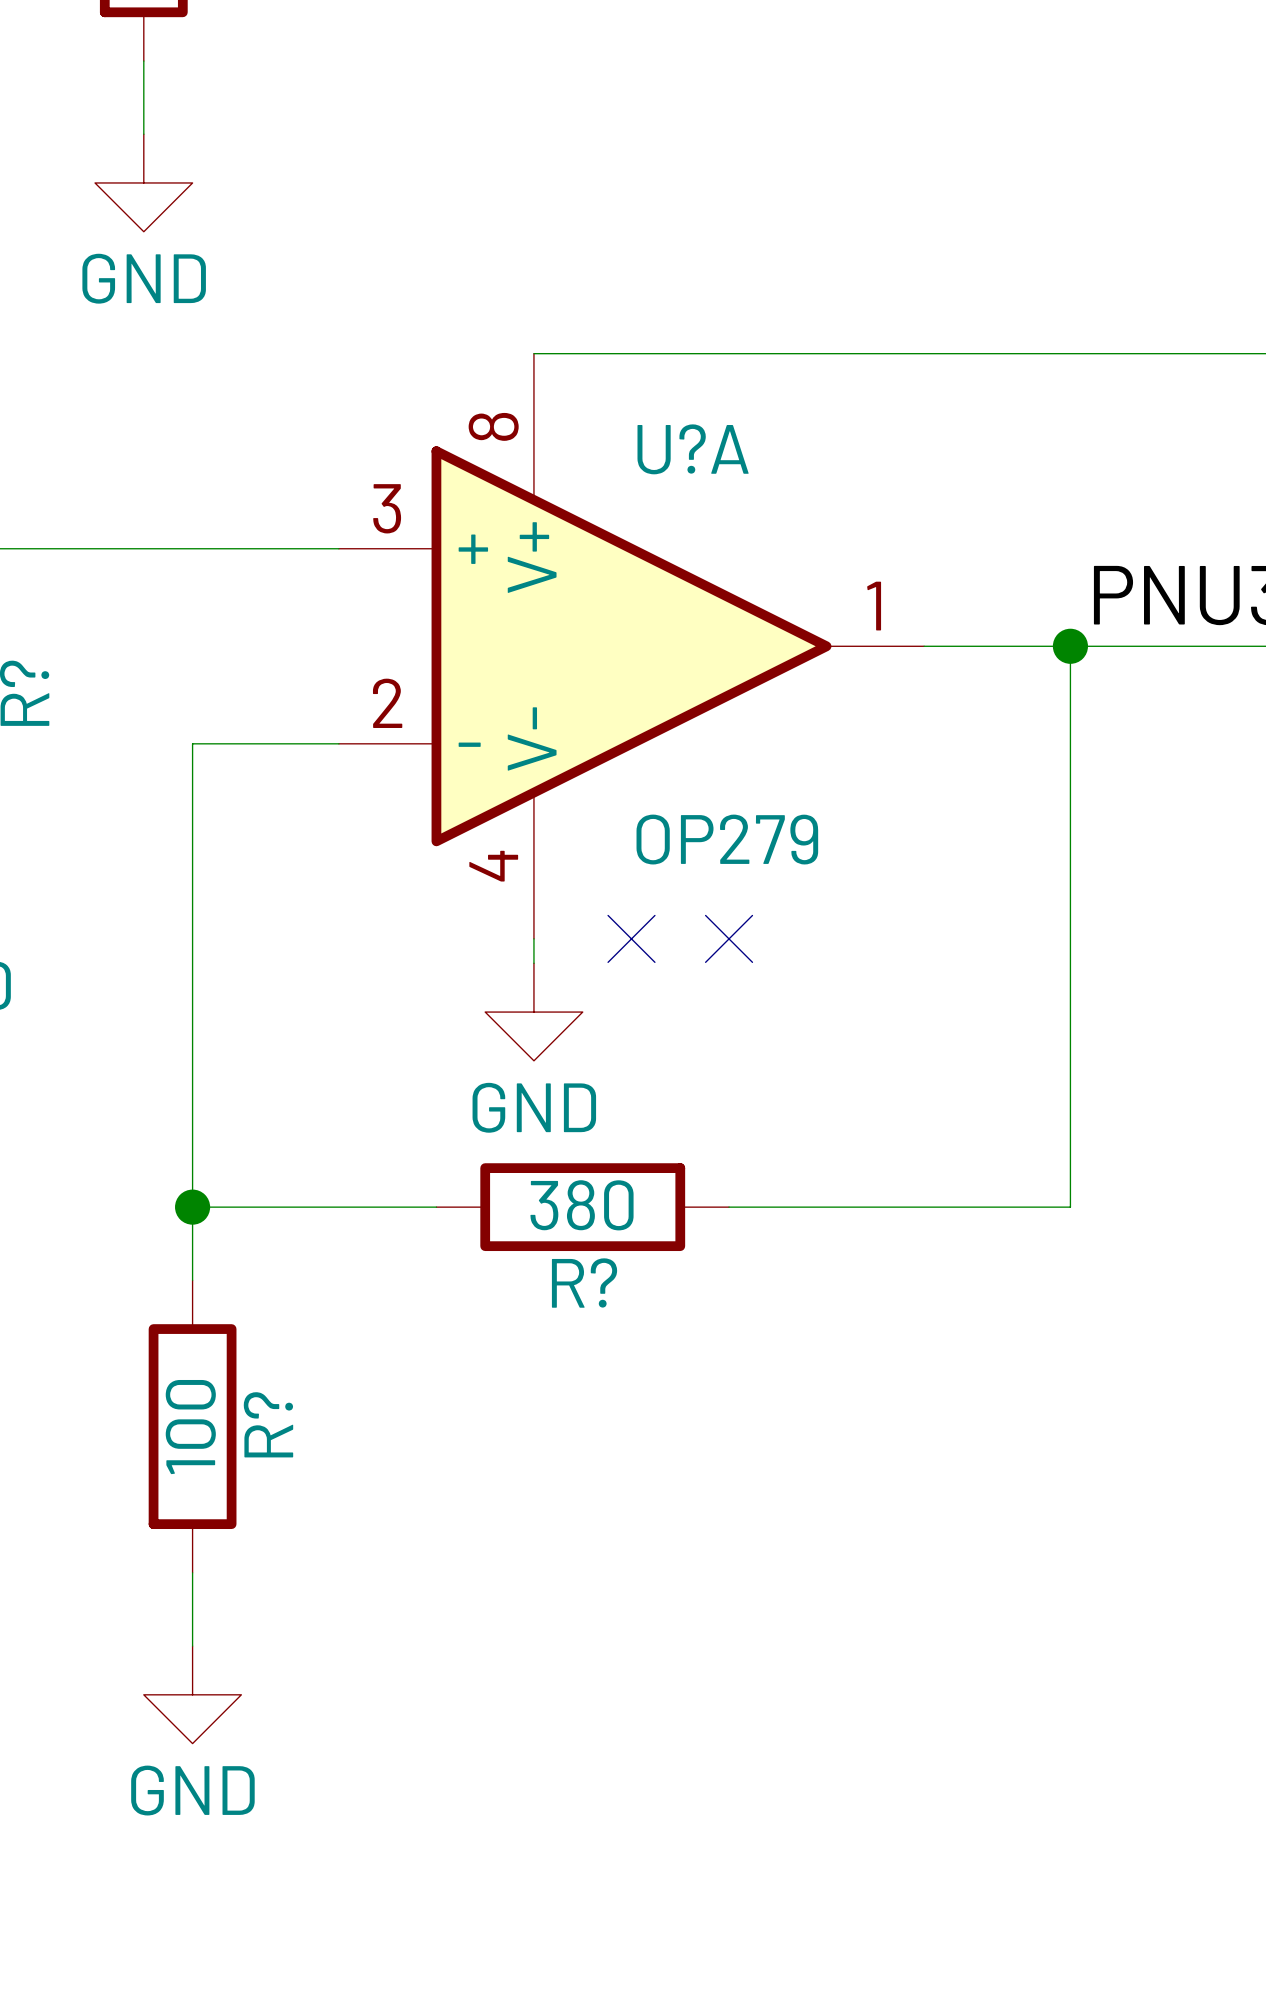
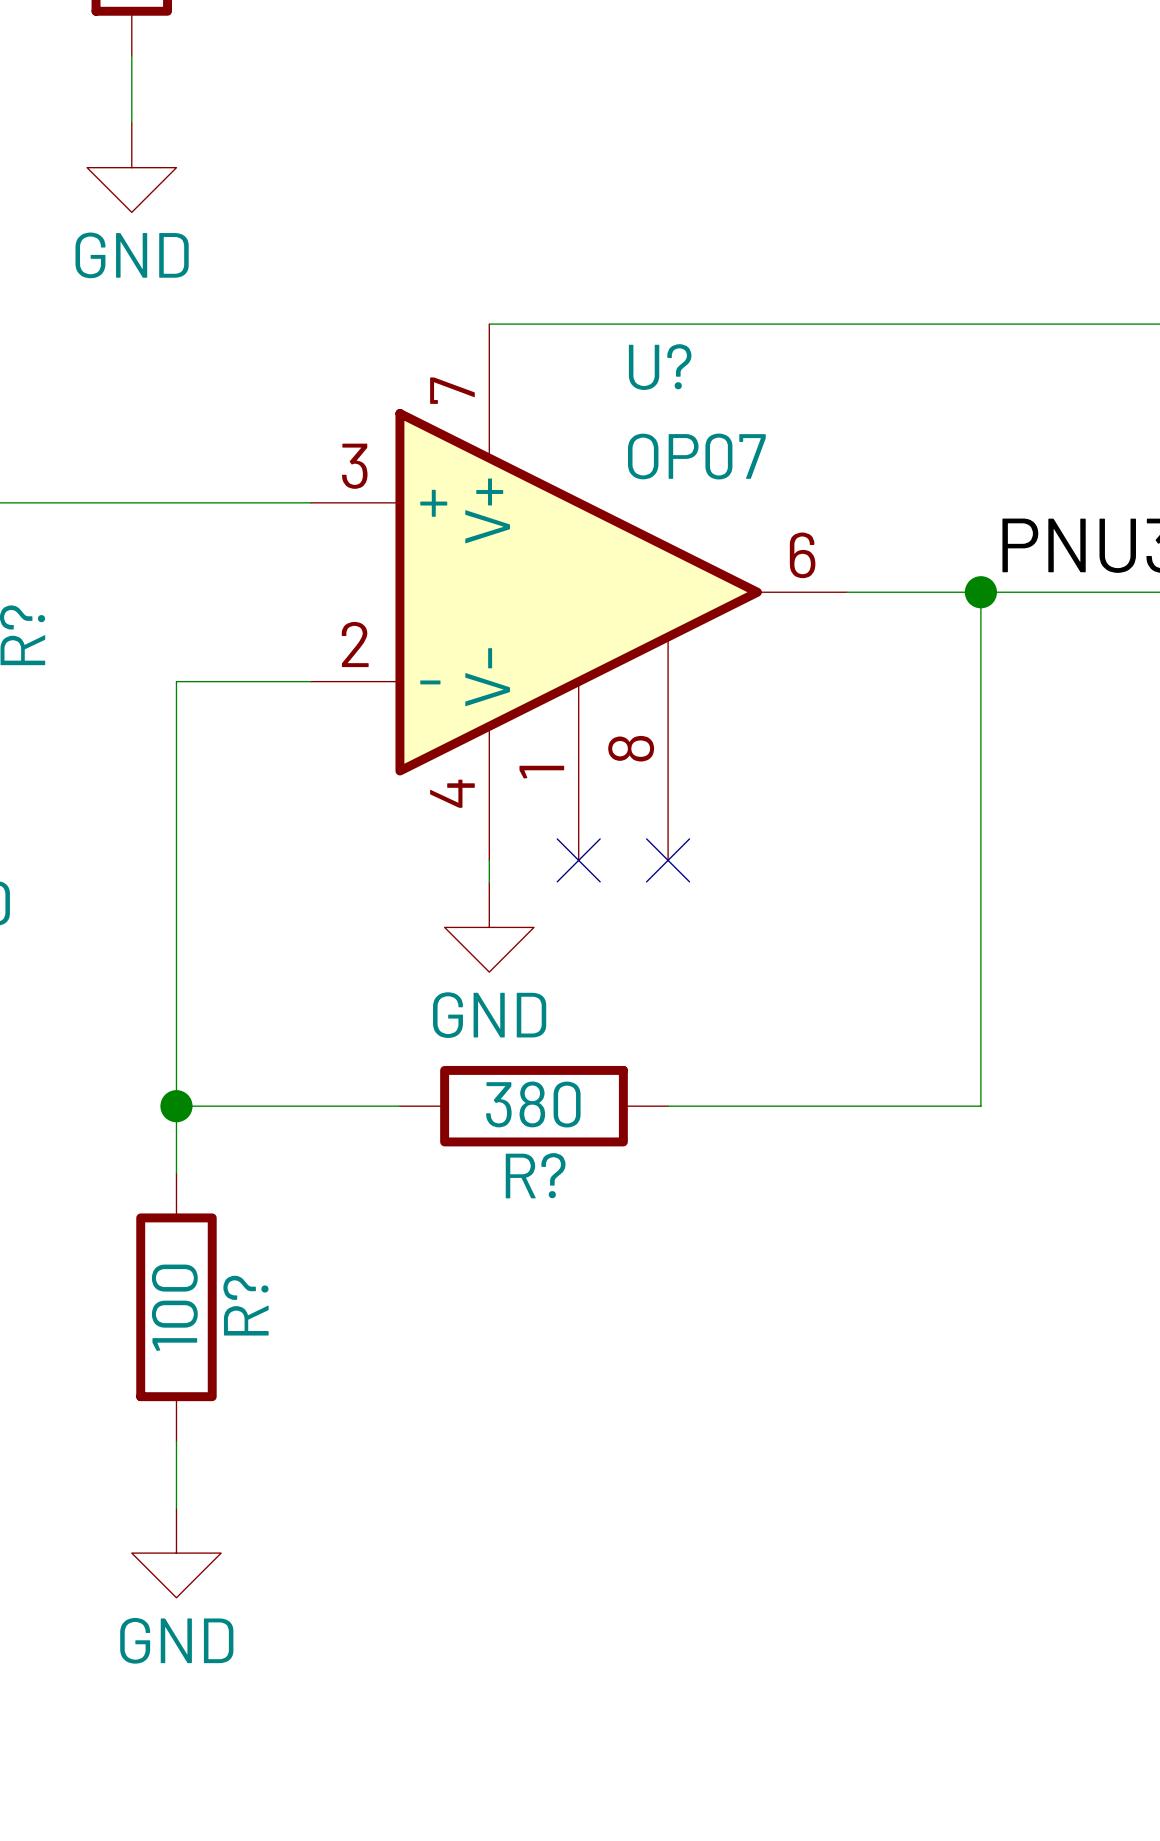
U?A: OP279 (631, 646) -> none
U?: none -> OP07 (578, 592)

